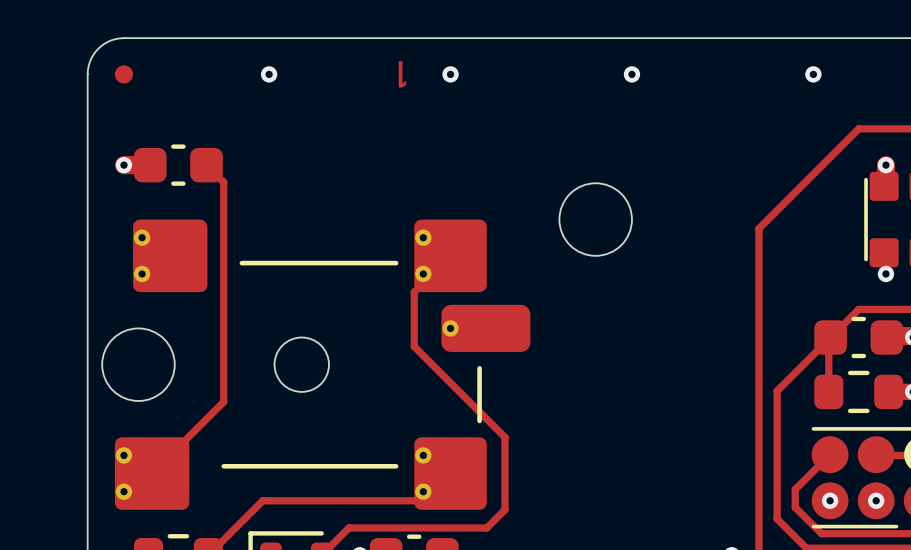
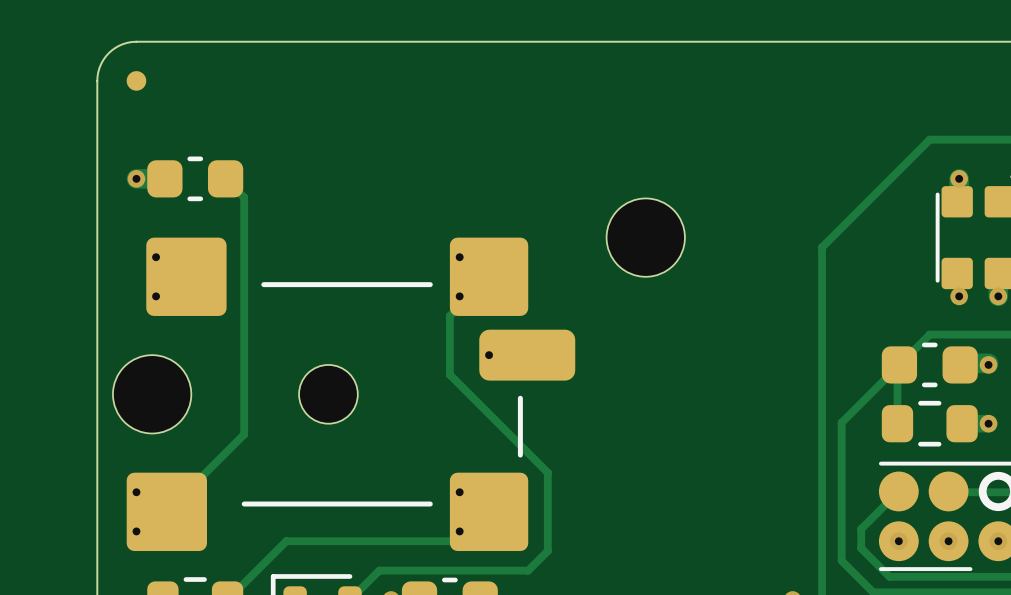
drawing: [398, 61, 407, 88] -> none
via: (269, 74) -> none
via: (450, 74) -> none
via: (631, 74) -> none
via: (813, 74) -> none

